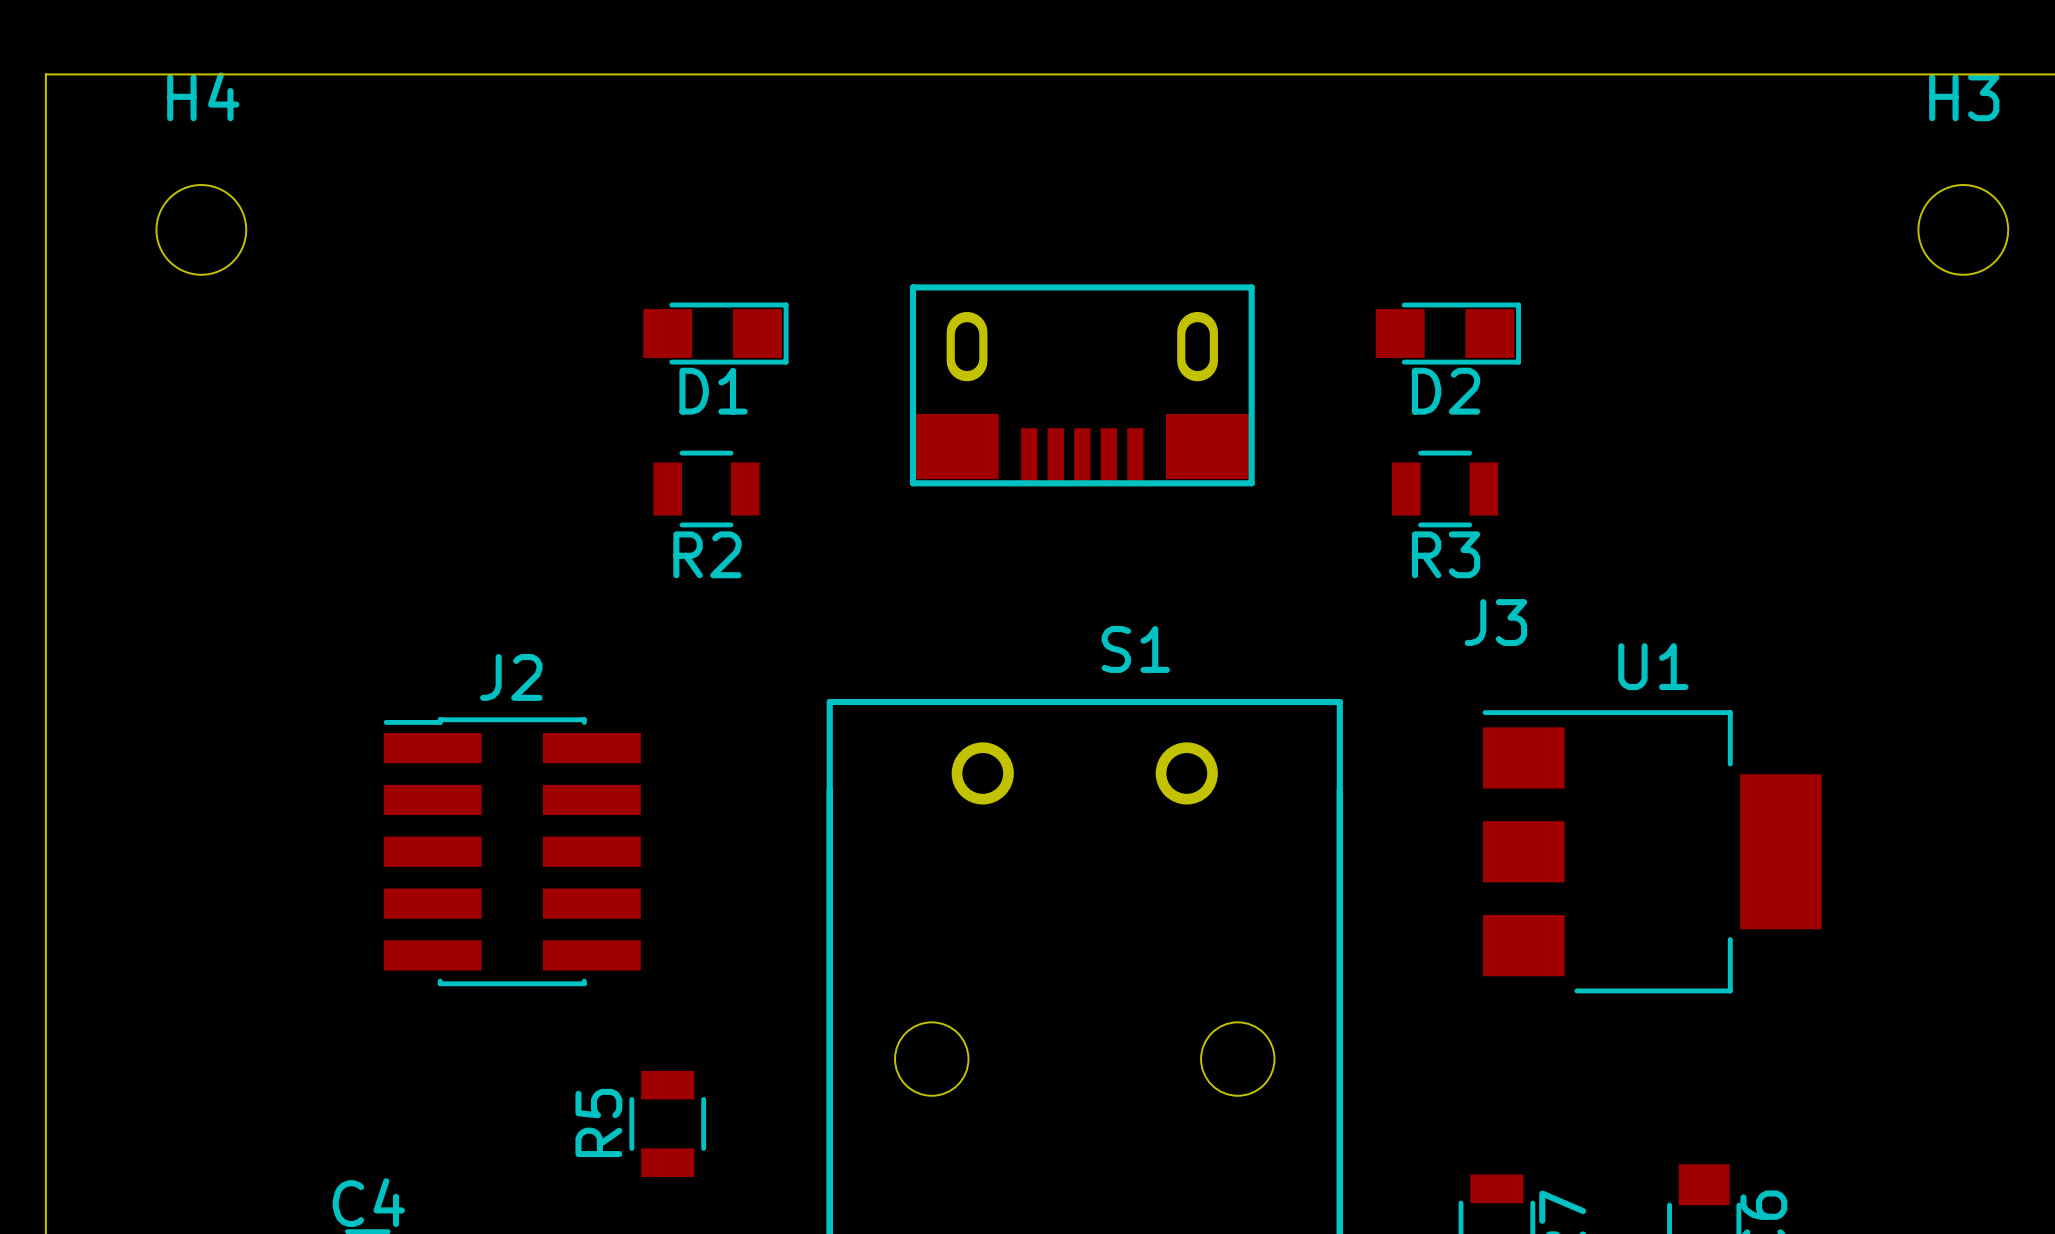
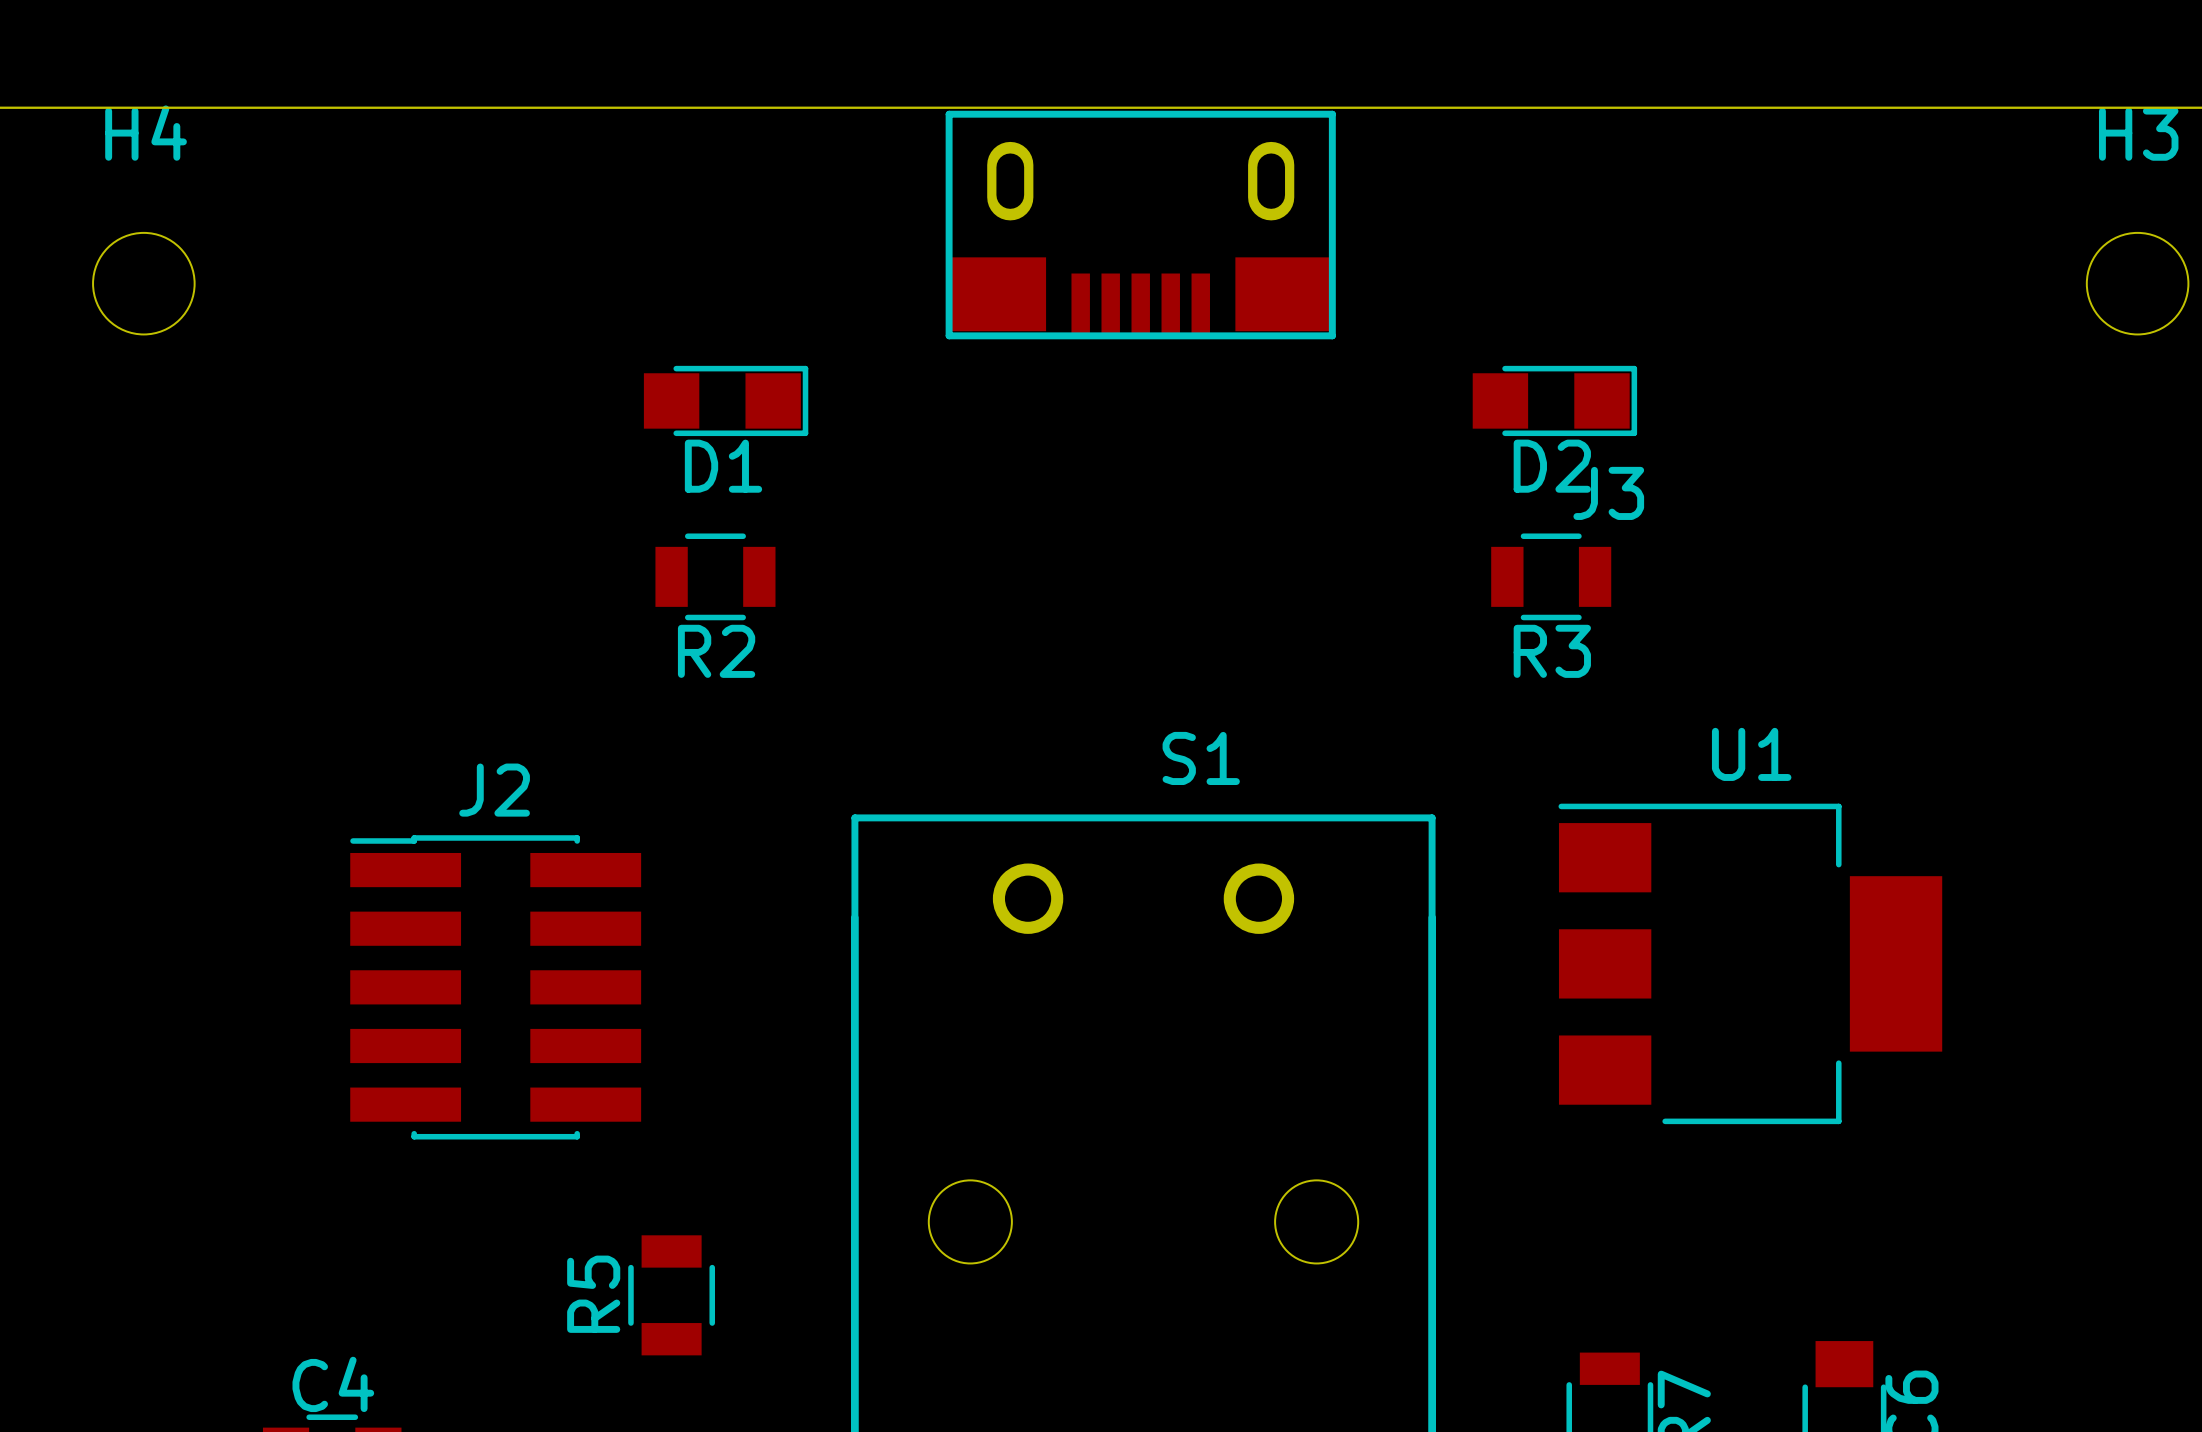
J3 position: (1082, 385) -> (1140, 225)
U1 position: (1652, 851) -> (1750, 963)

